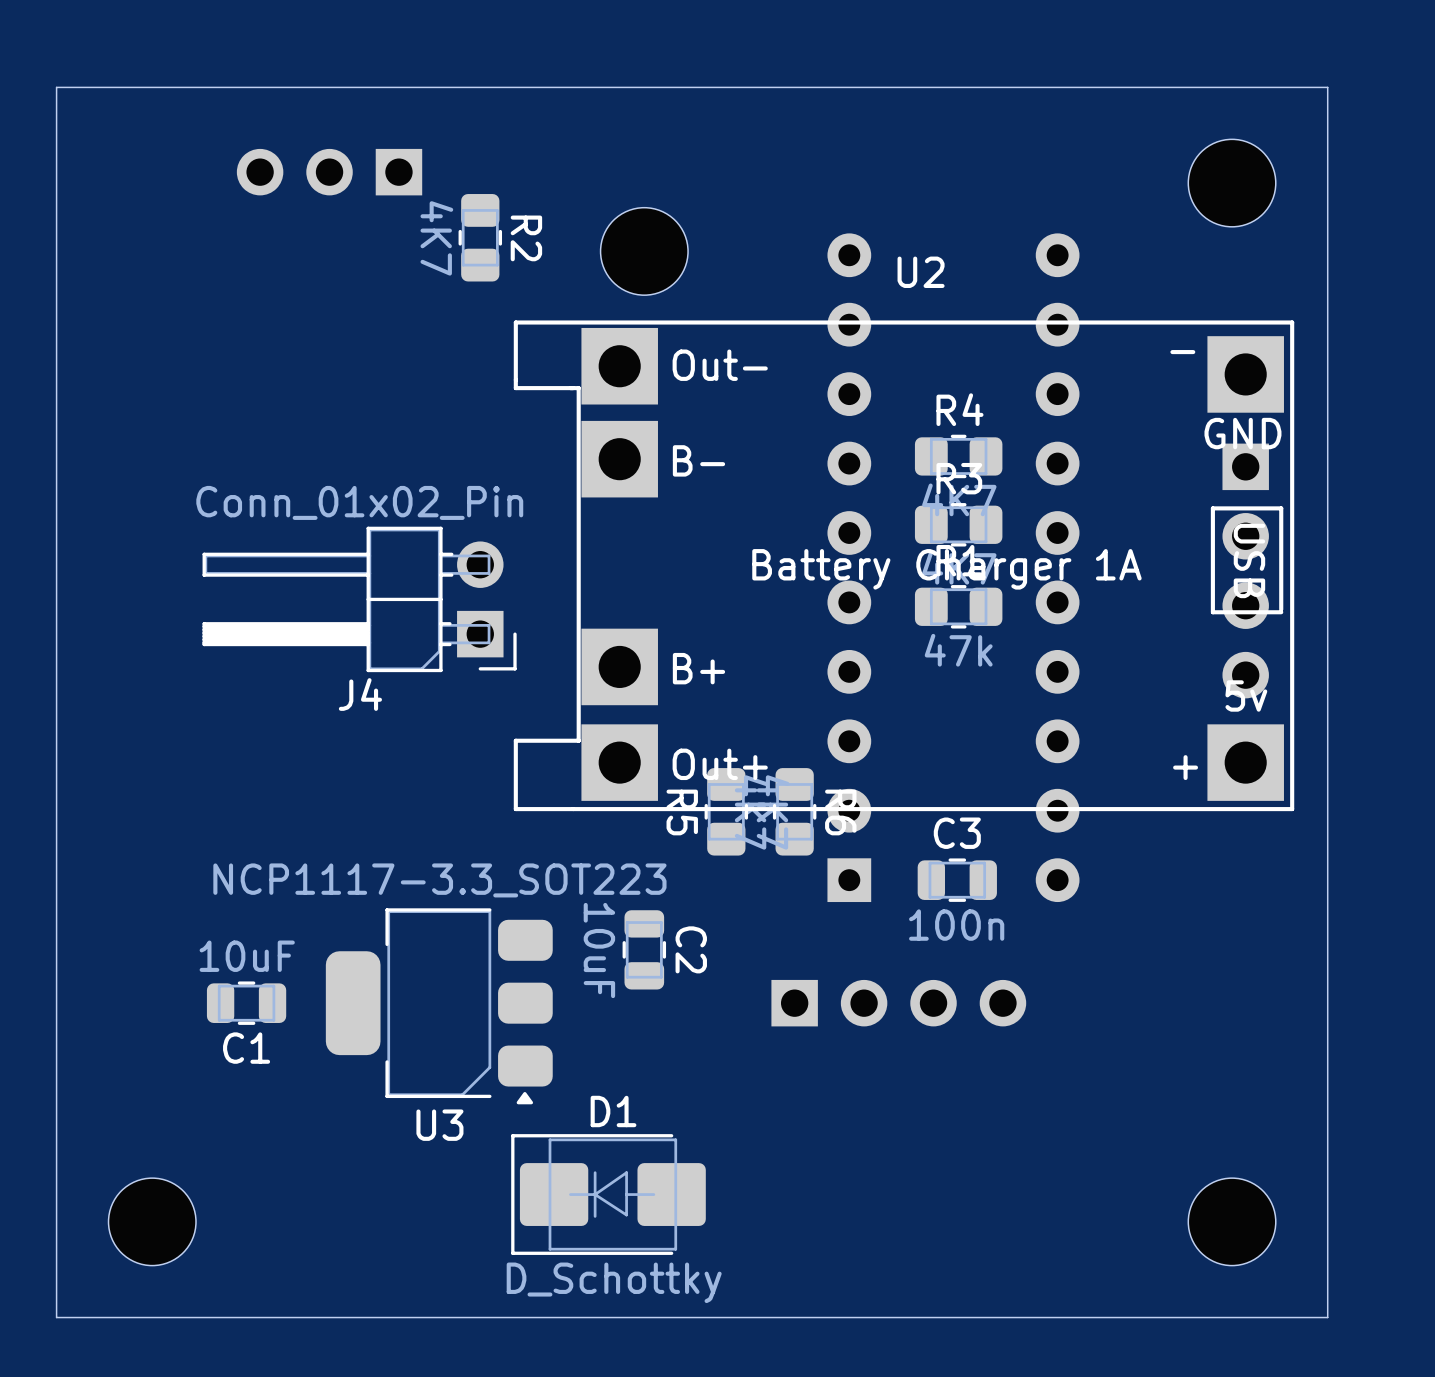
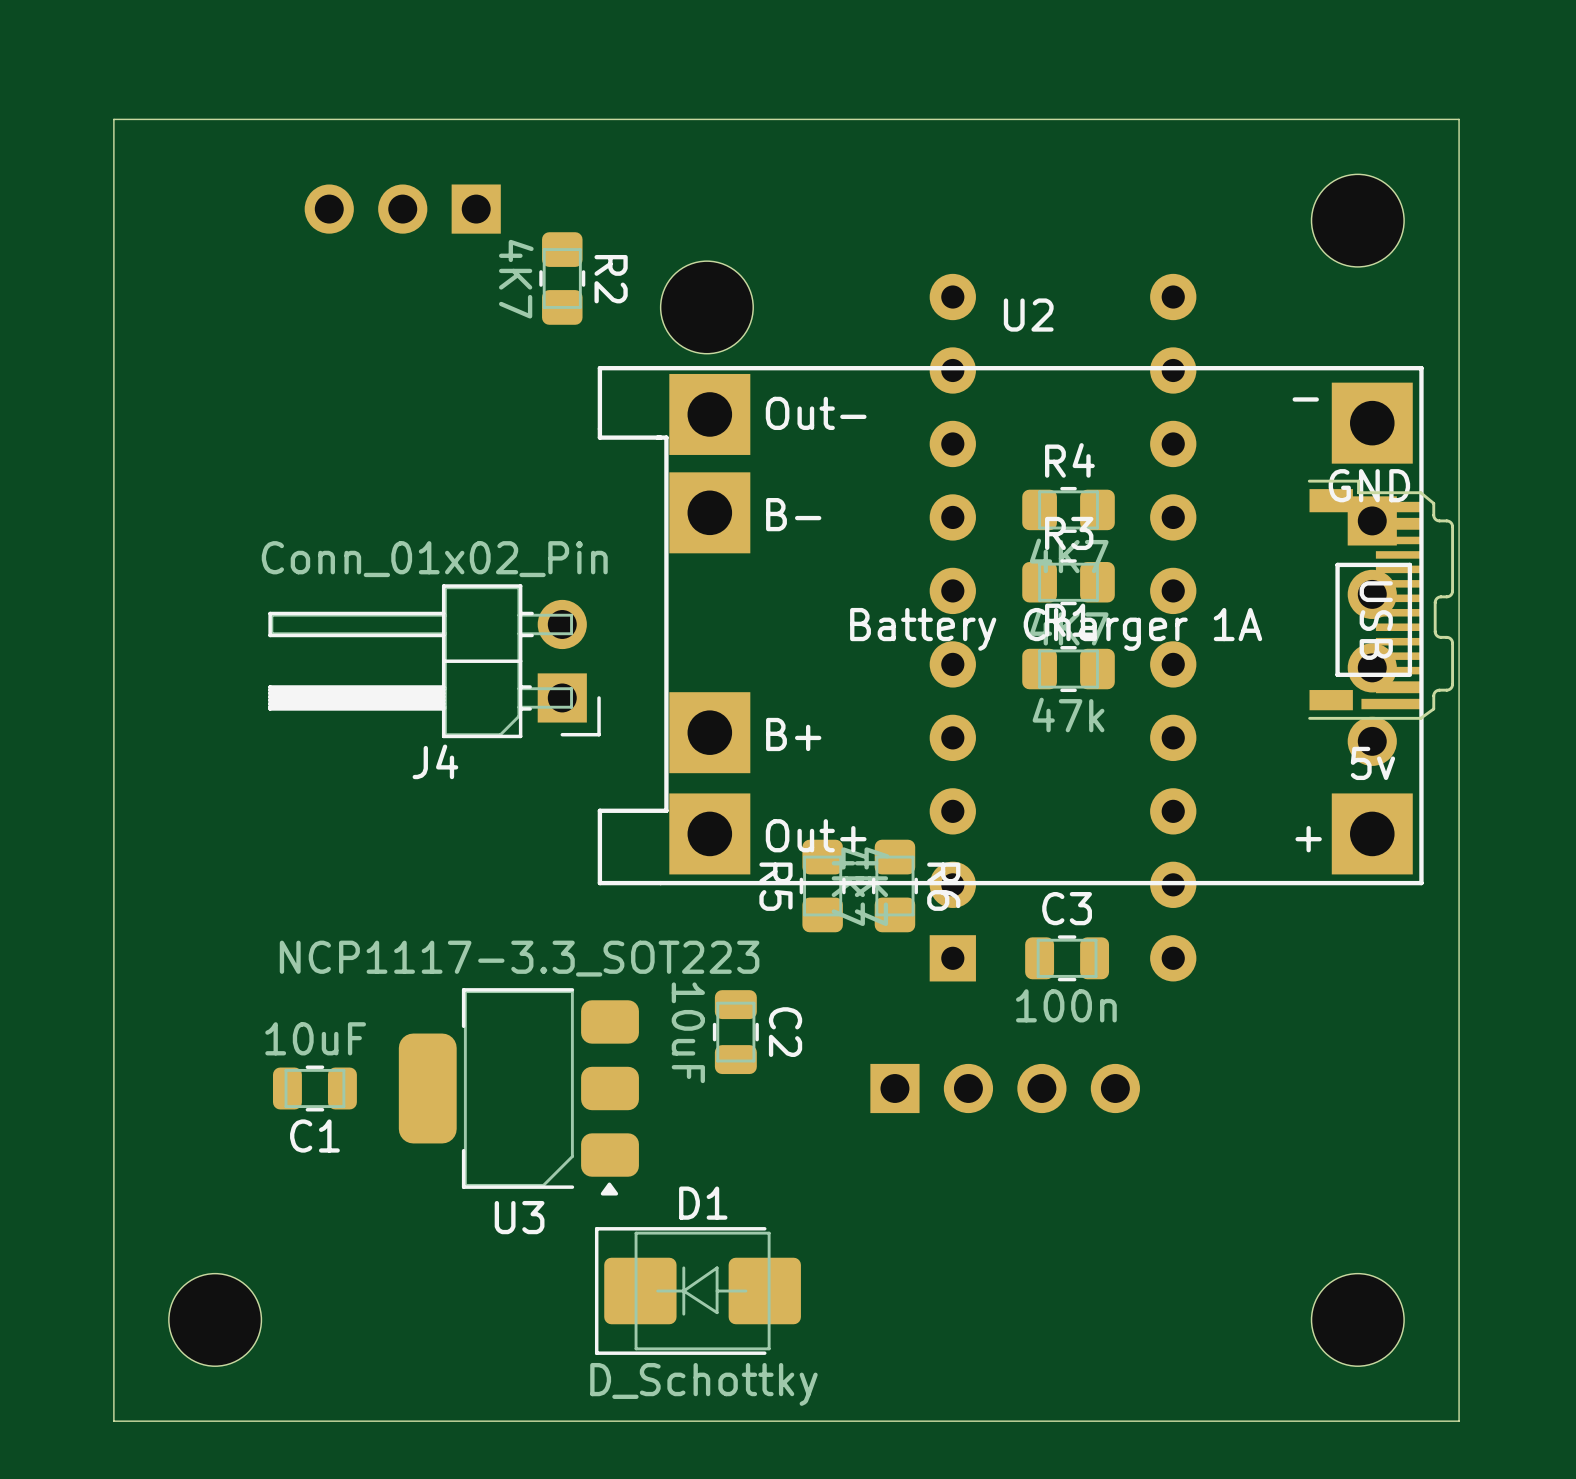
part position: (644, 251) -> (706, 307)
part: none -> (1380, 599)

